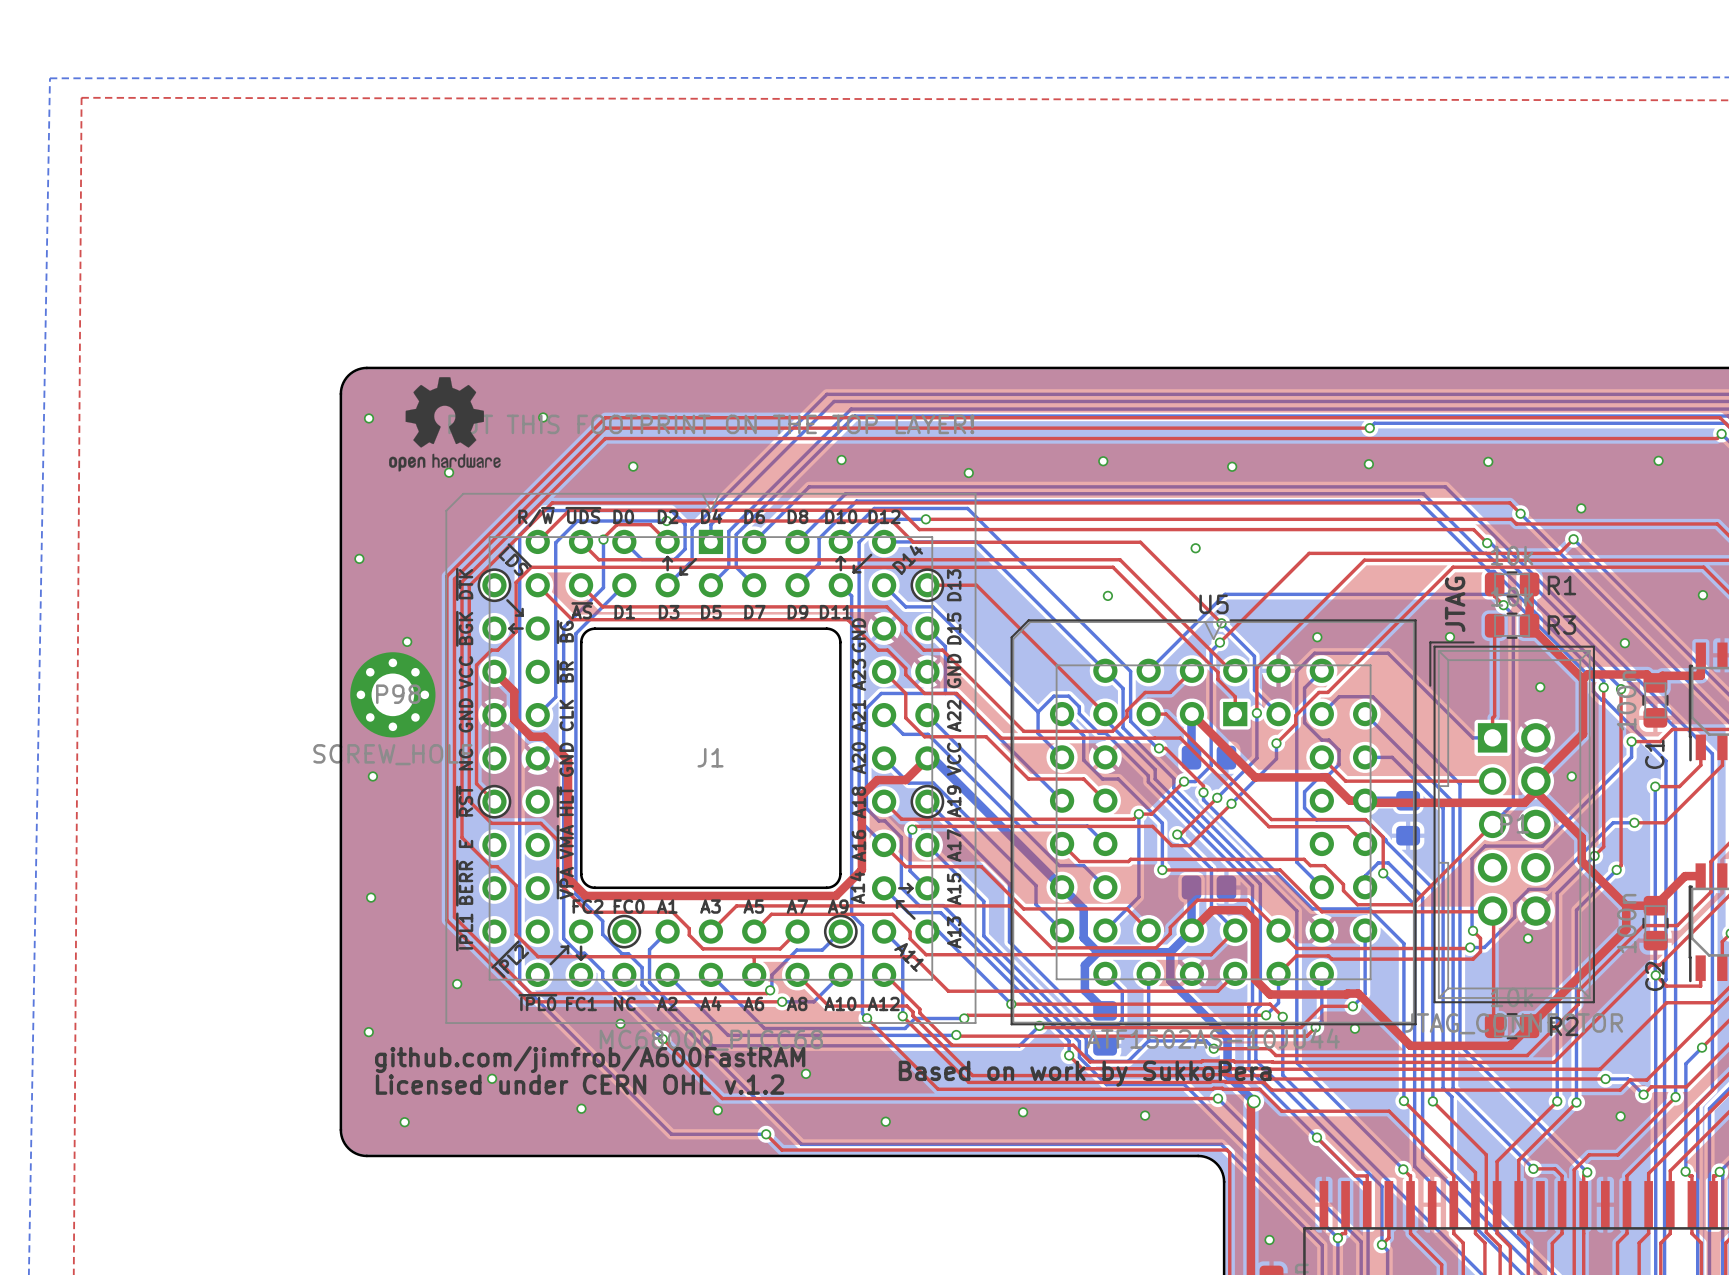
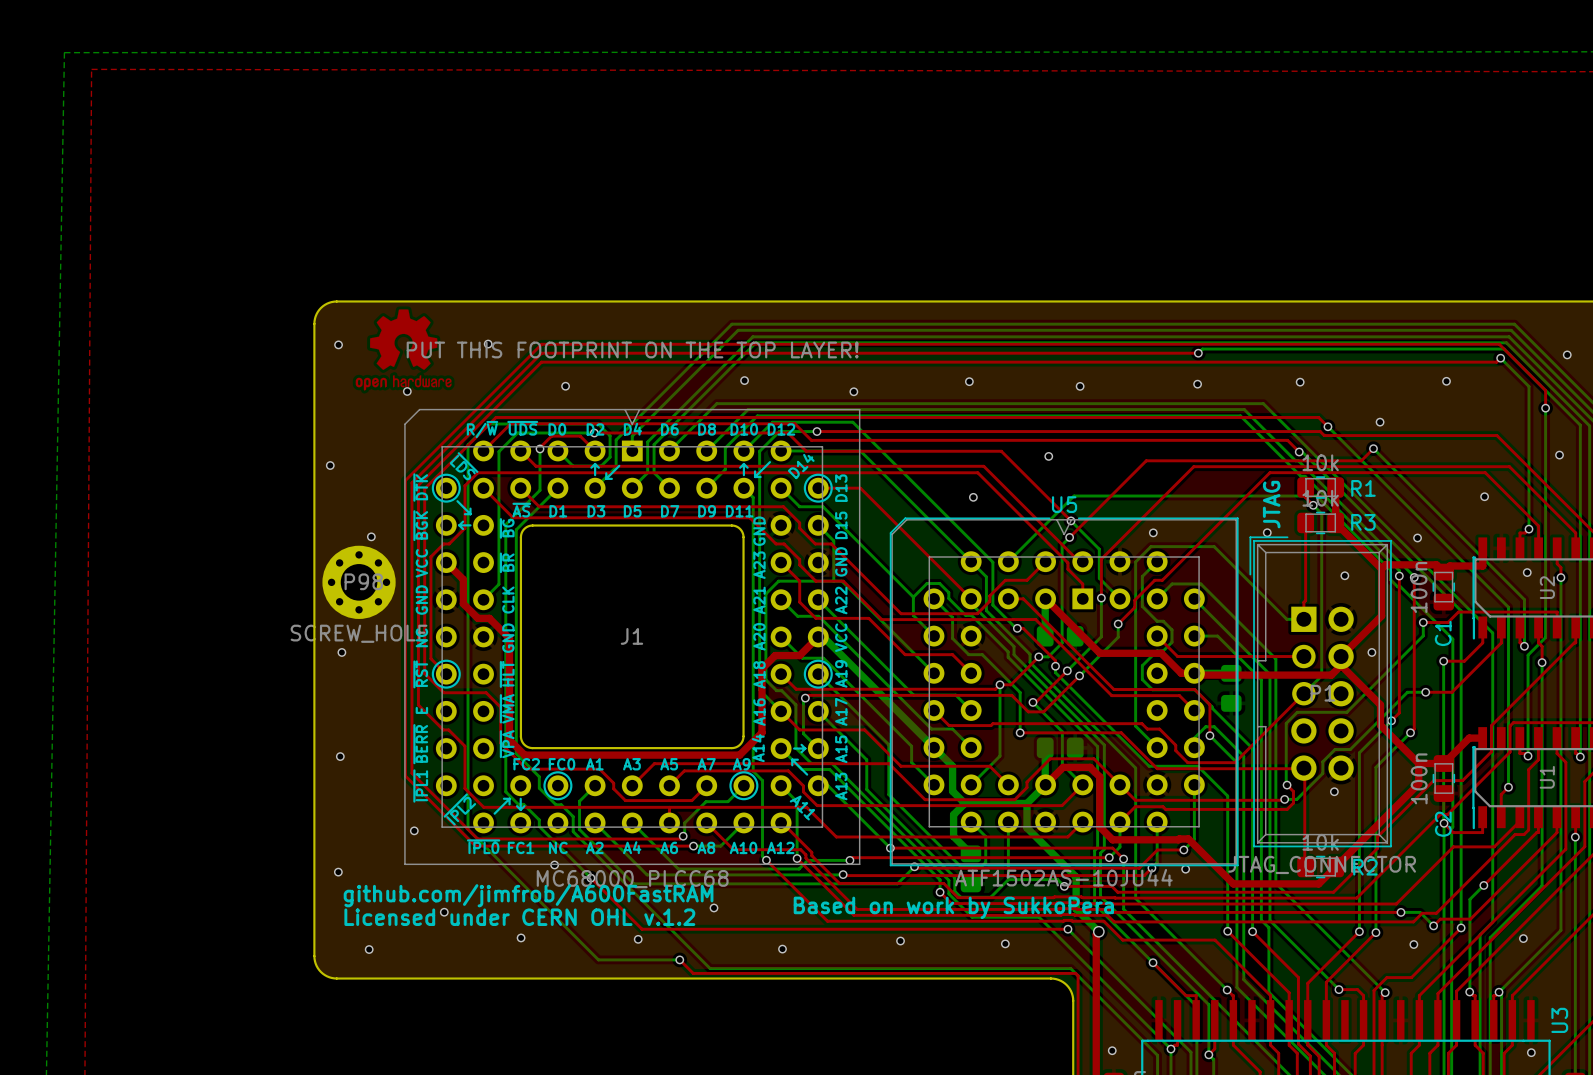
drawing shape: [389, 377, 501, 472] -> [355, 309, 452, 391]

